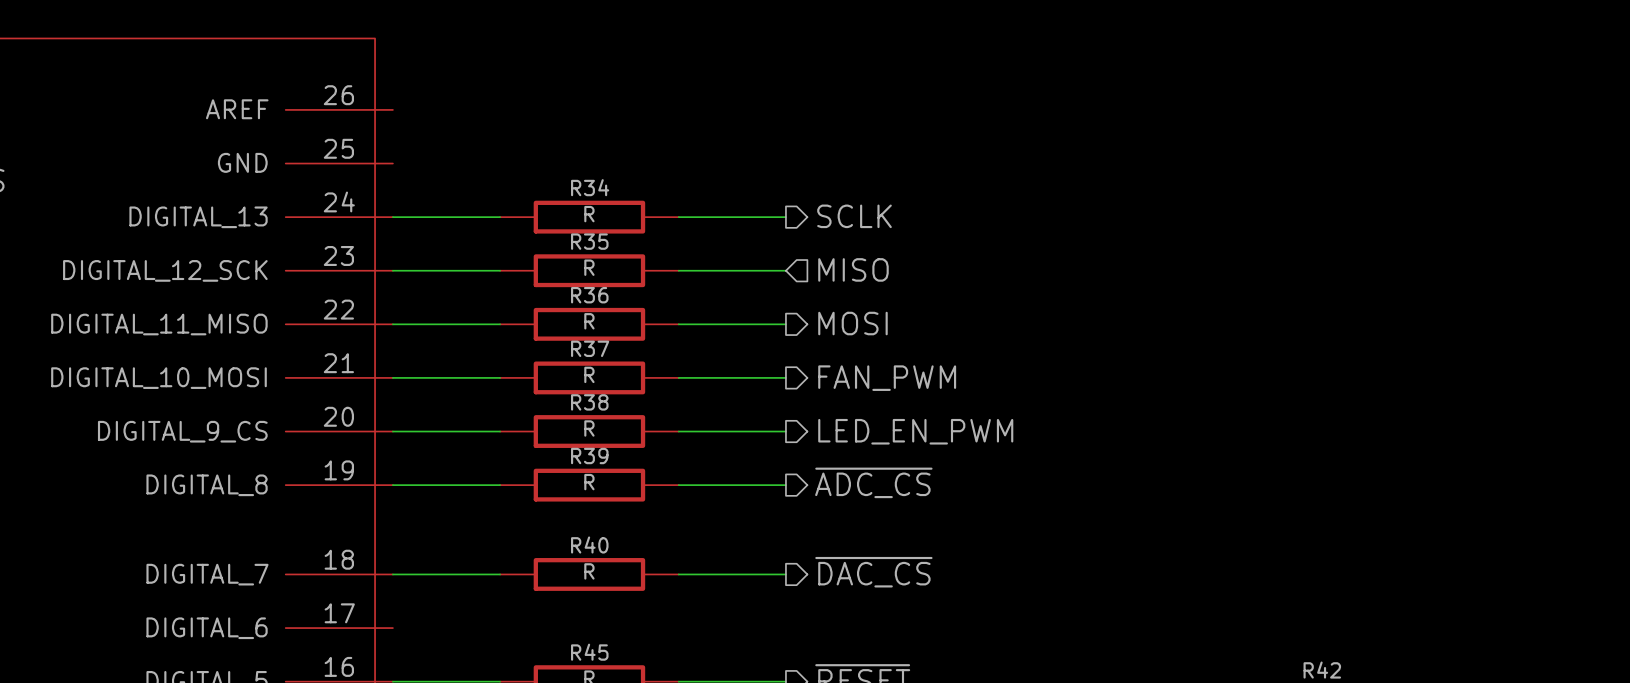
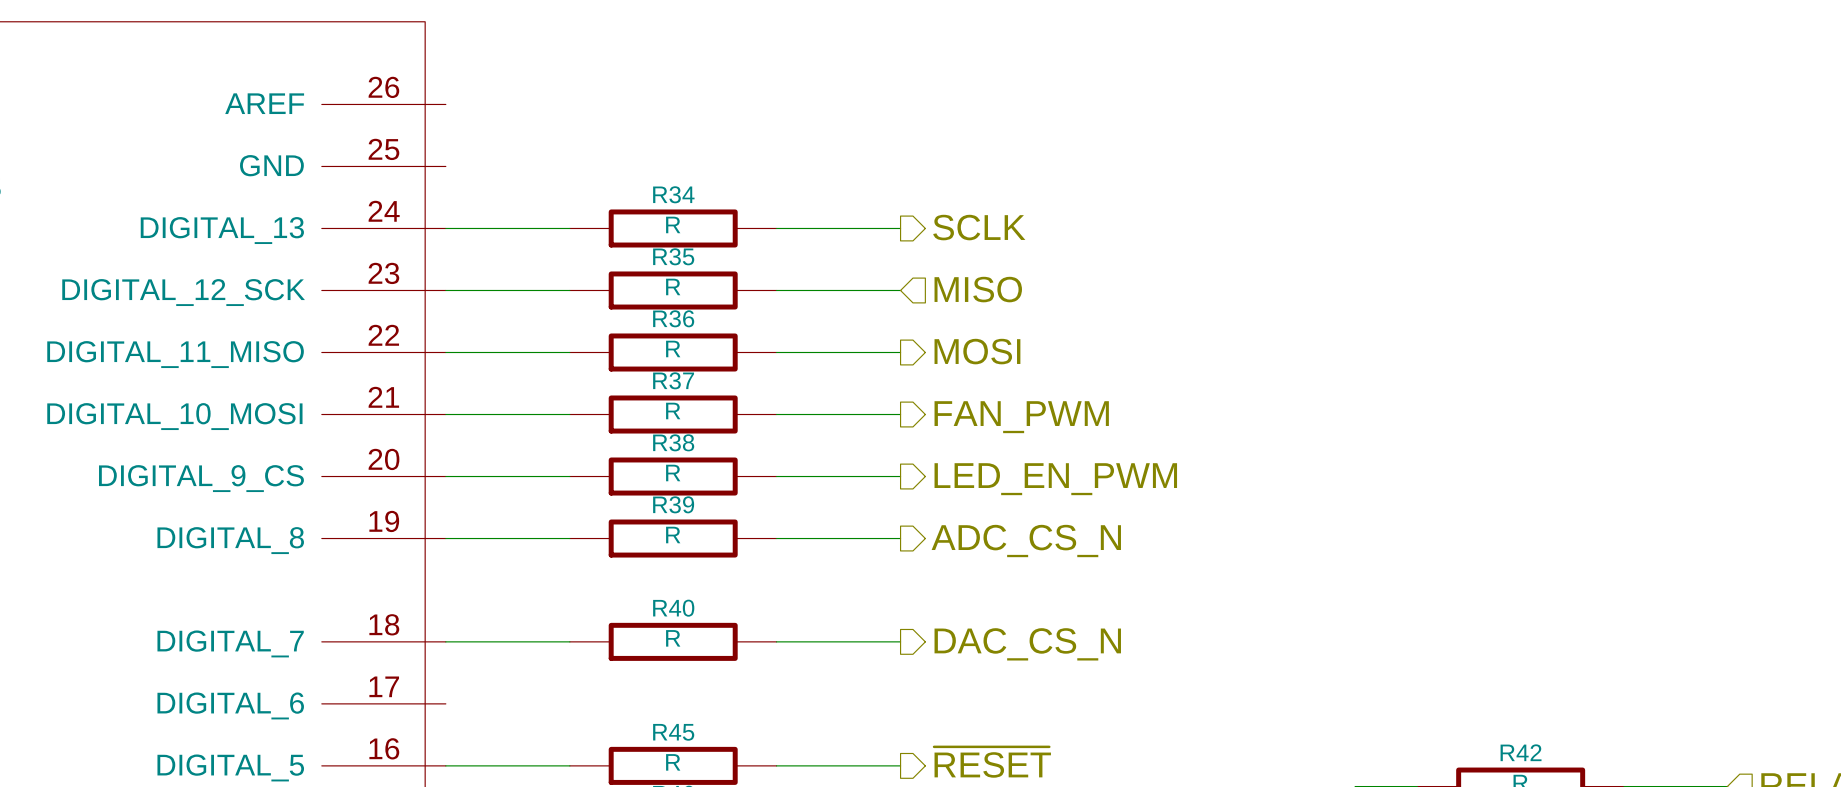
hierarchical label: ~{ADC_CS} (873, 482) -> ADC_CS_N (1026, 540)
hierarchical label: ~{DAC_CS} (873, 572) -> DAC_CS_N (1027, 644)

